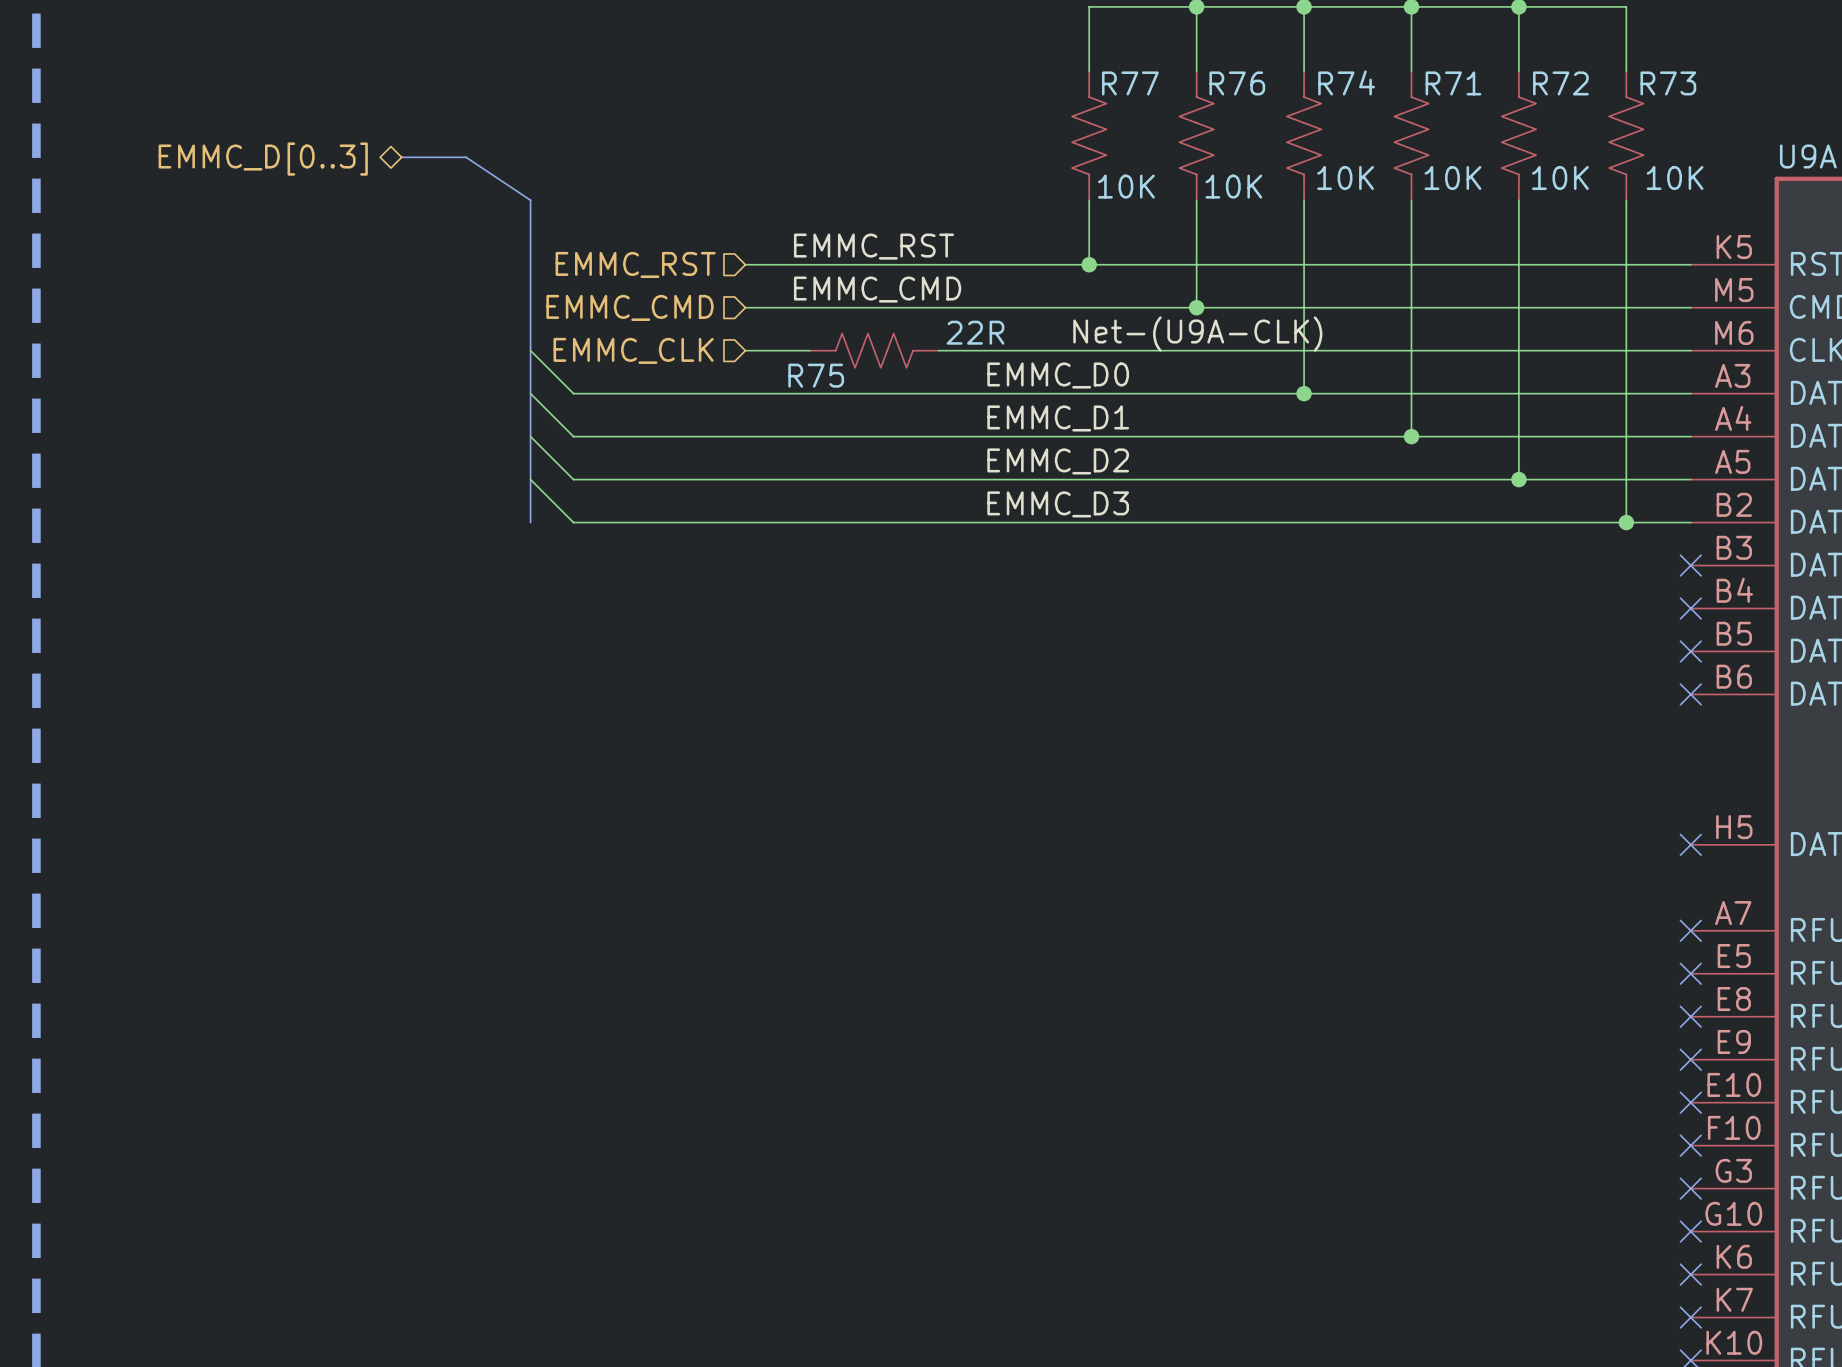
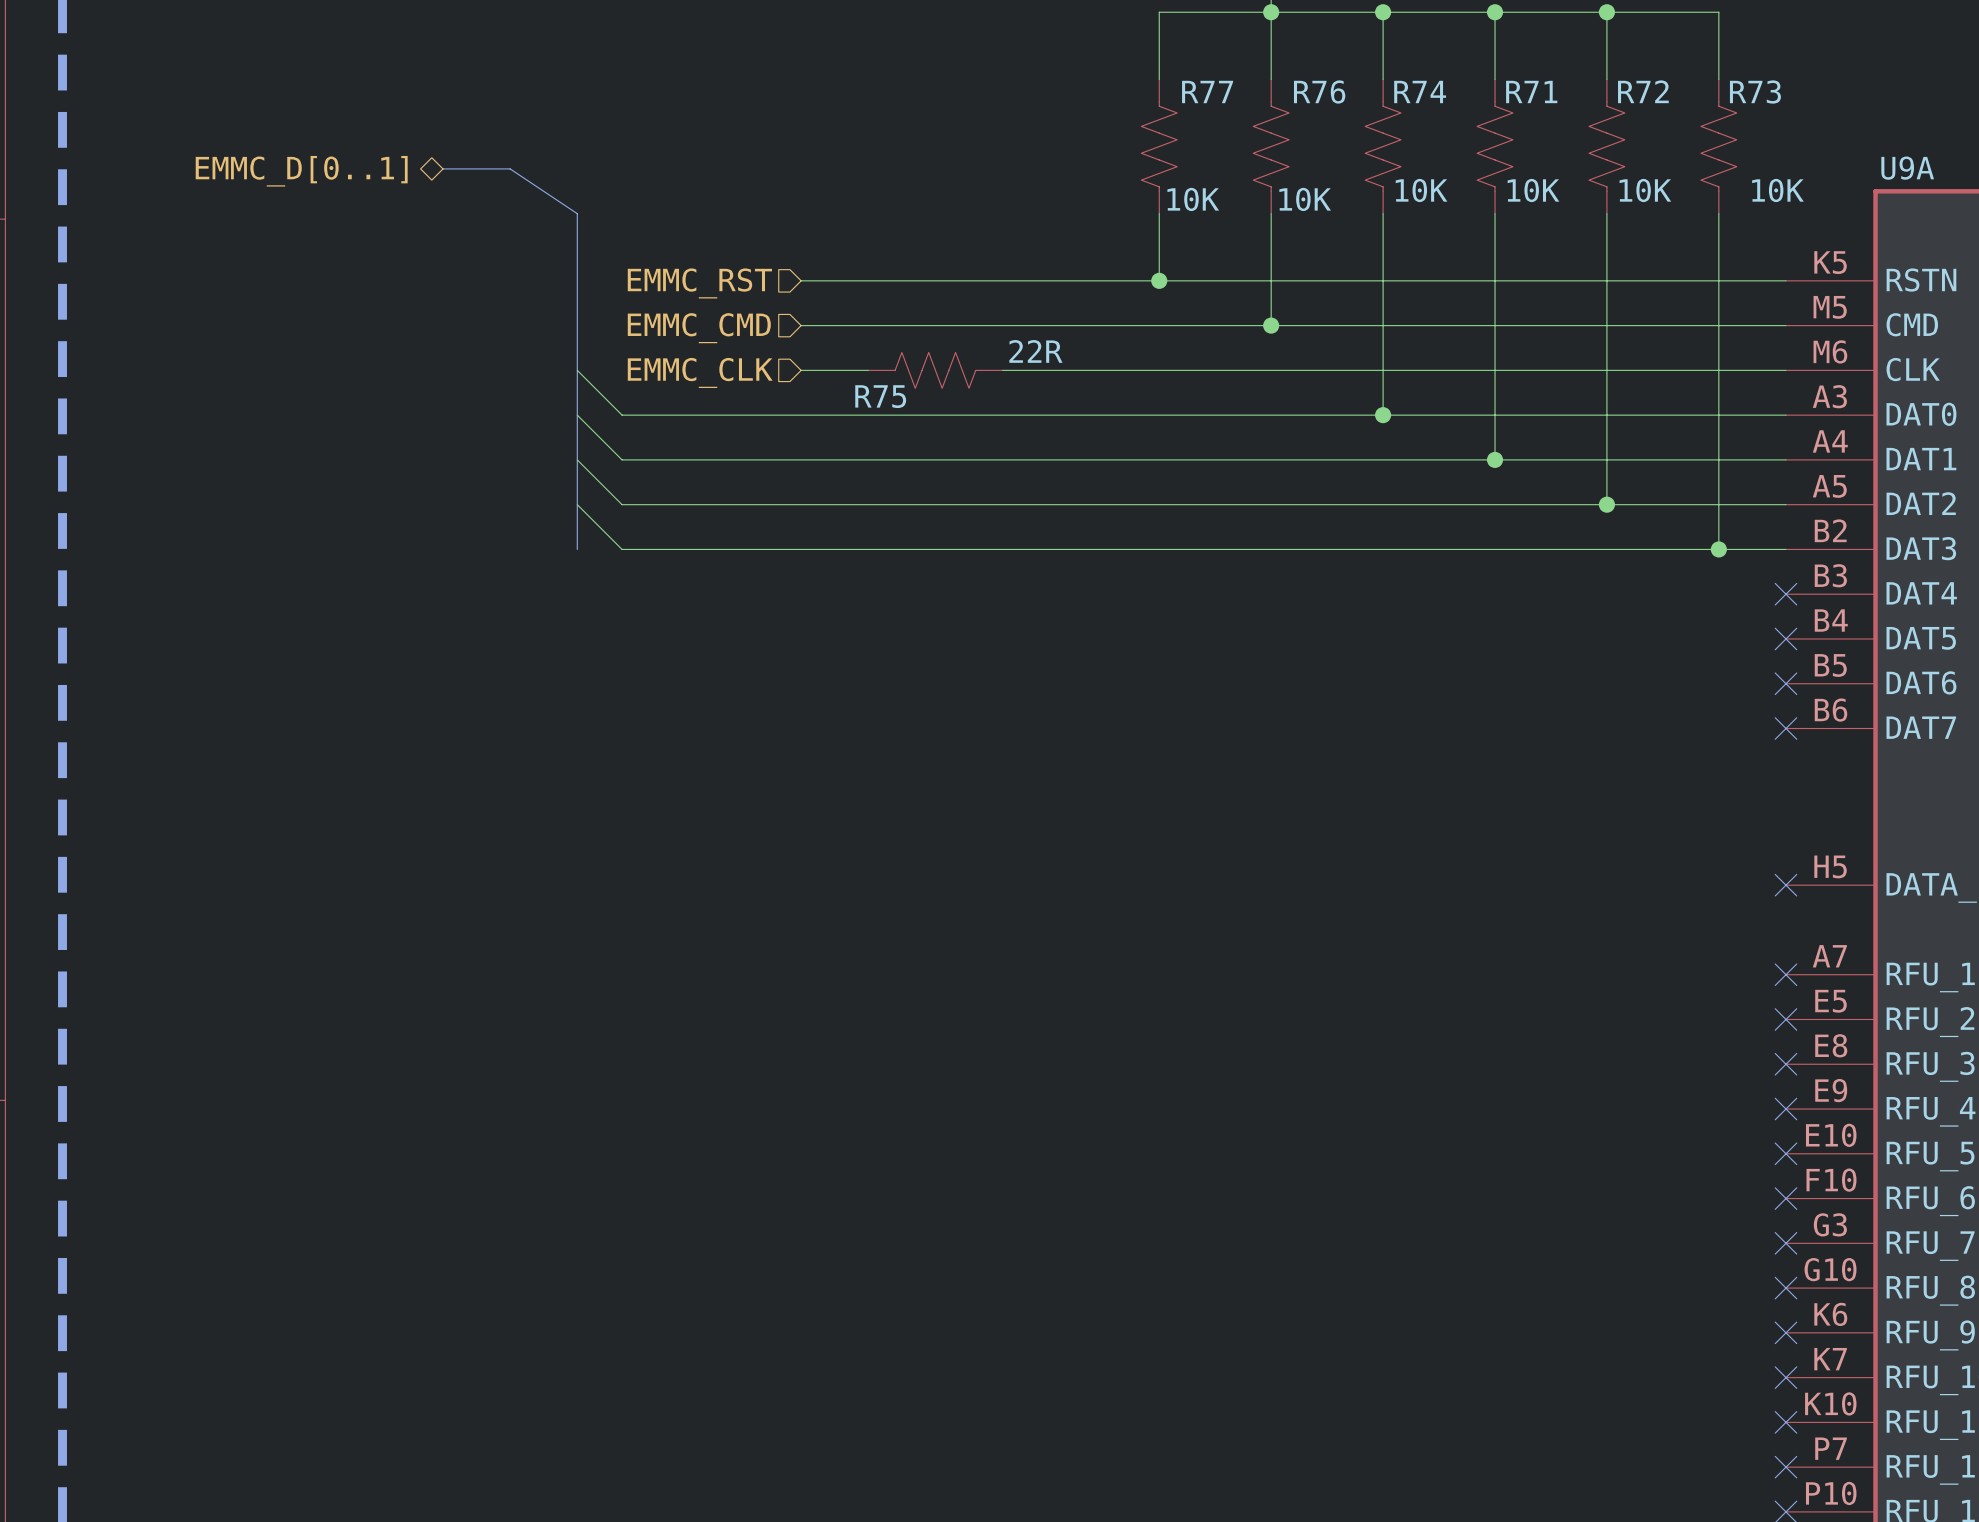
hierarchical label: EMMC_D[0..3] (263, 159) -> EMMC_D[0..1] (301, 171)
label: EMMC_RST (874, 246) -> none
label: EMMC_CMD (877, 289) -> none
label: Net-(U9A-CLK) (1197, 334) -> none
label: EMMC_D0 (1058, 375) -> none
label: EMMC_D1 (1058, 418) -> none
label: EMMC_D2 (1058, 461) -> none
label: EMMC_D3 (1058, 504) -> none

